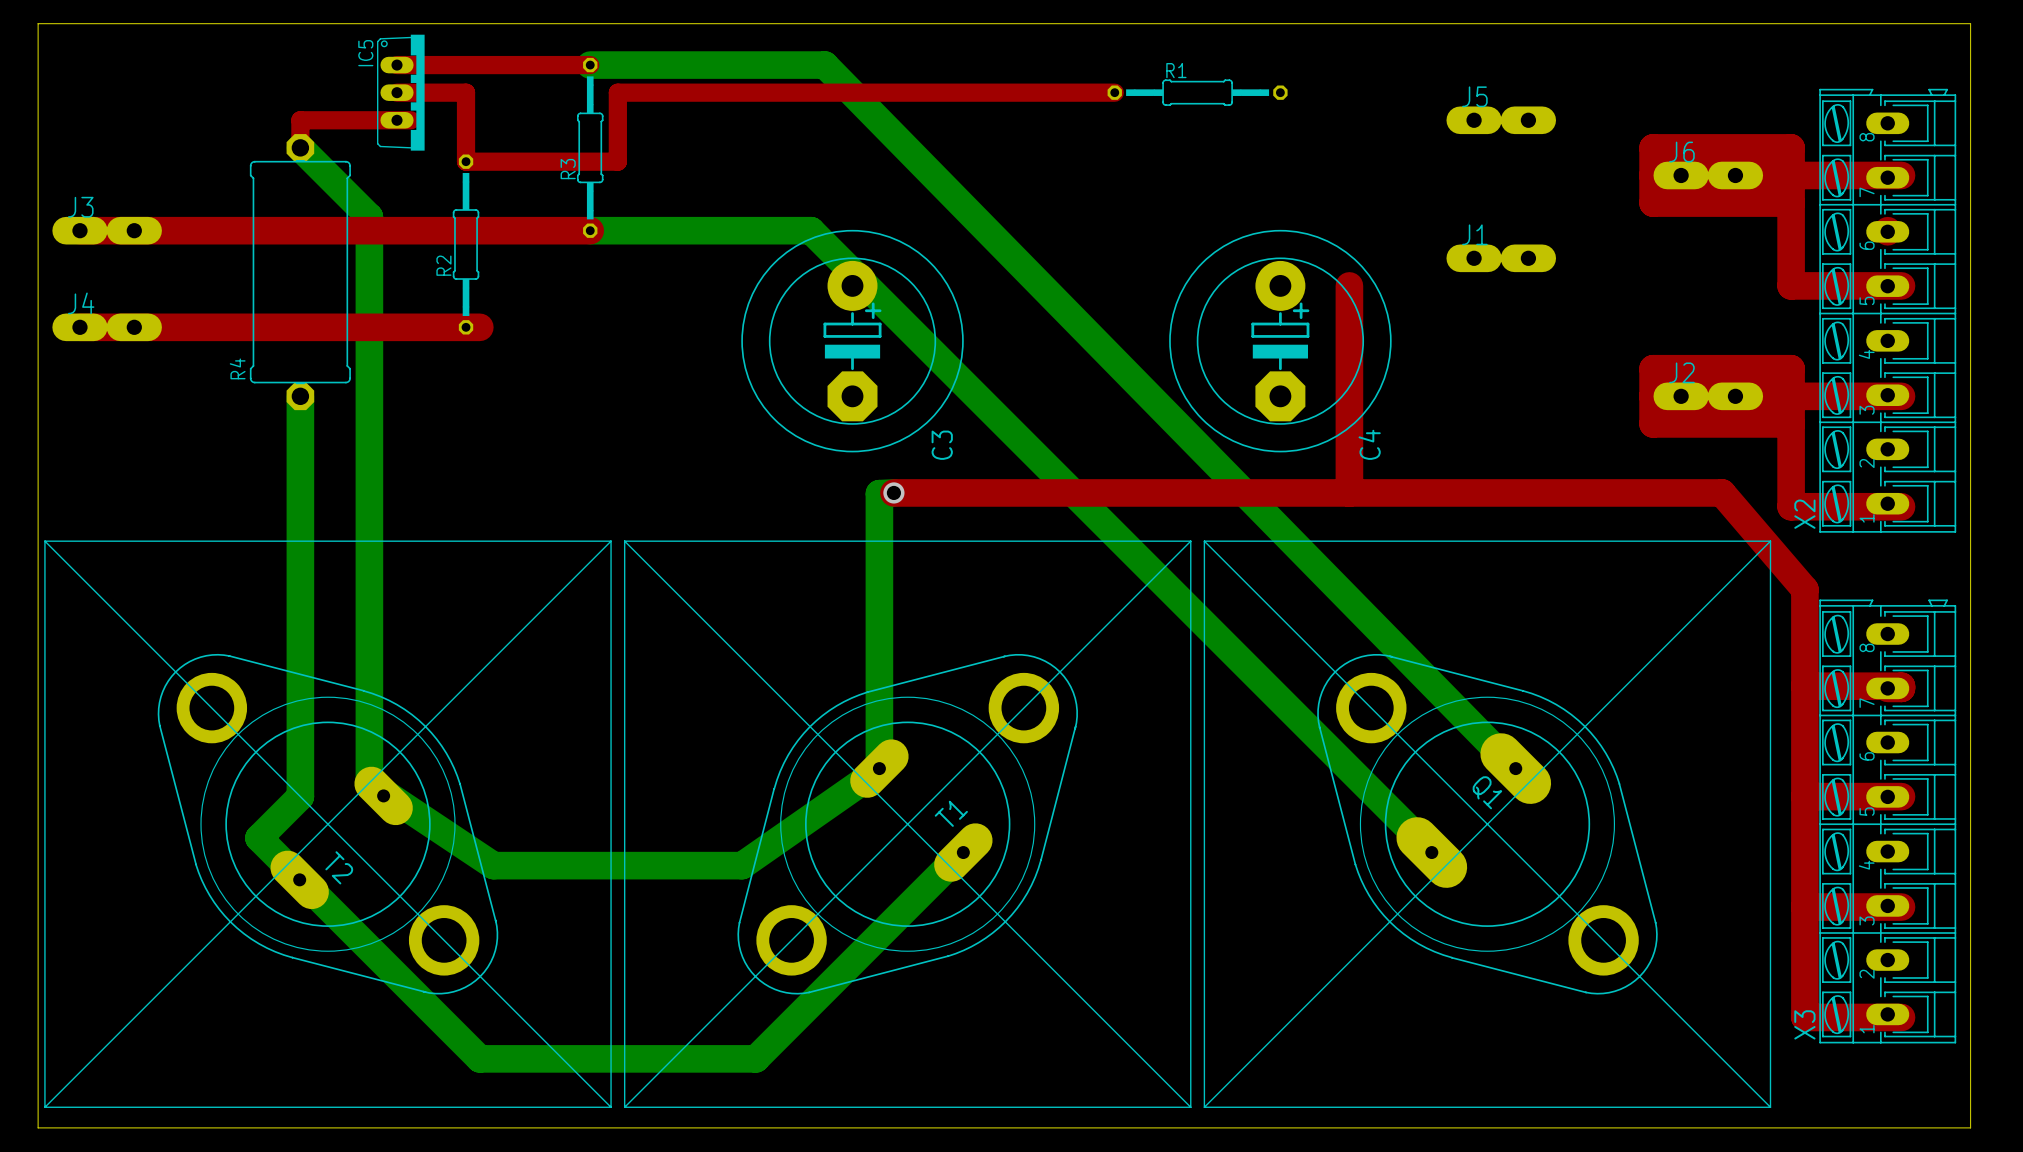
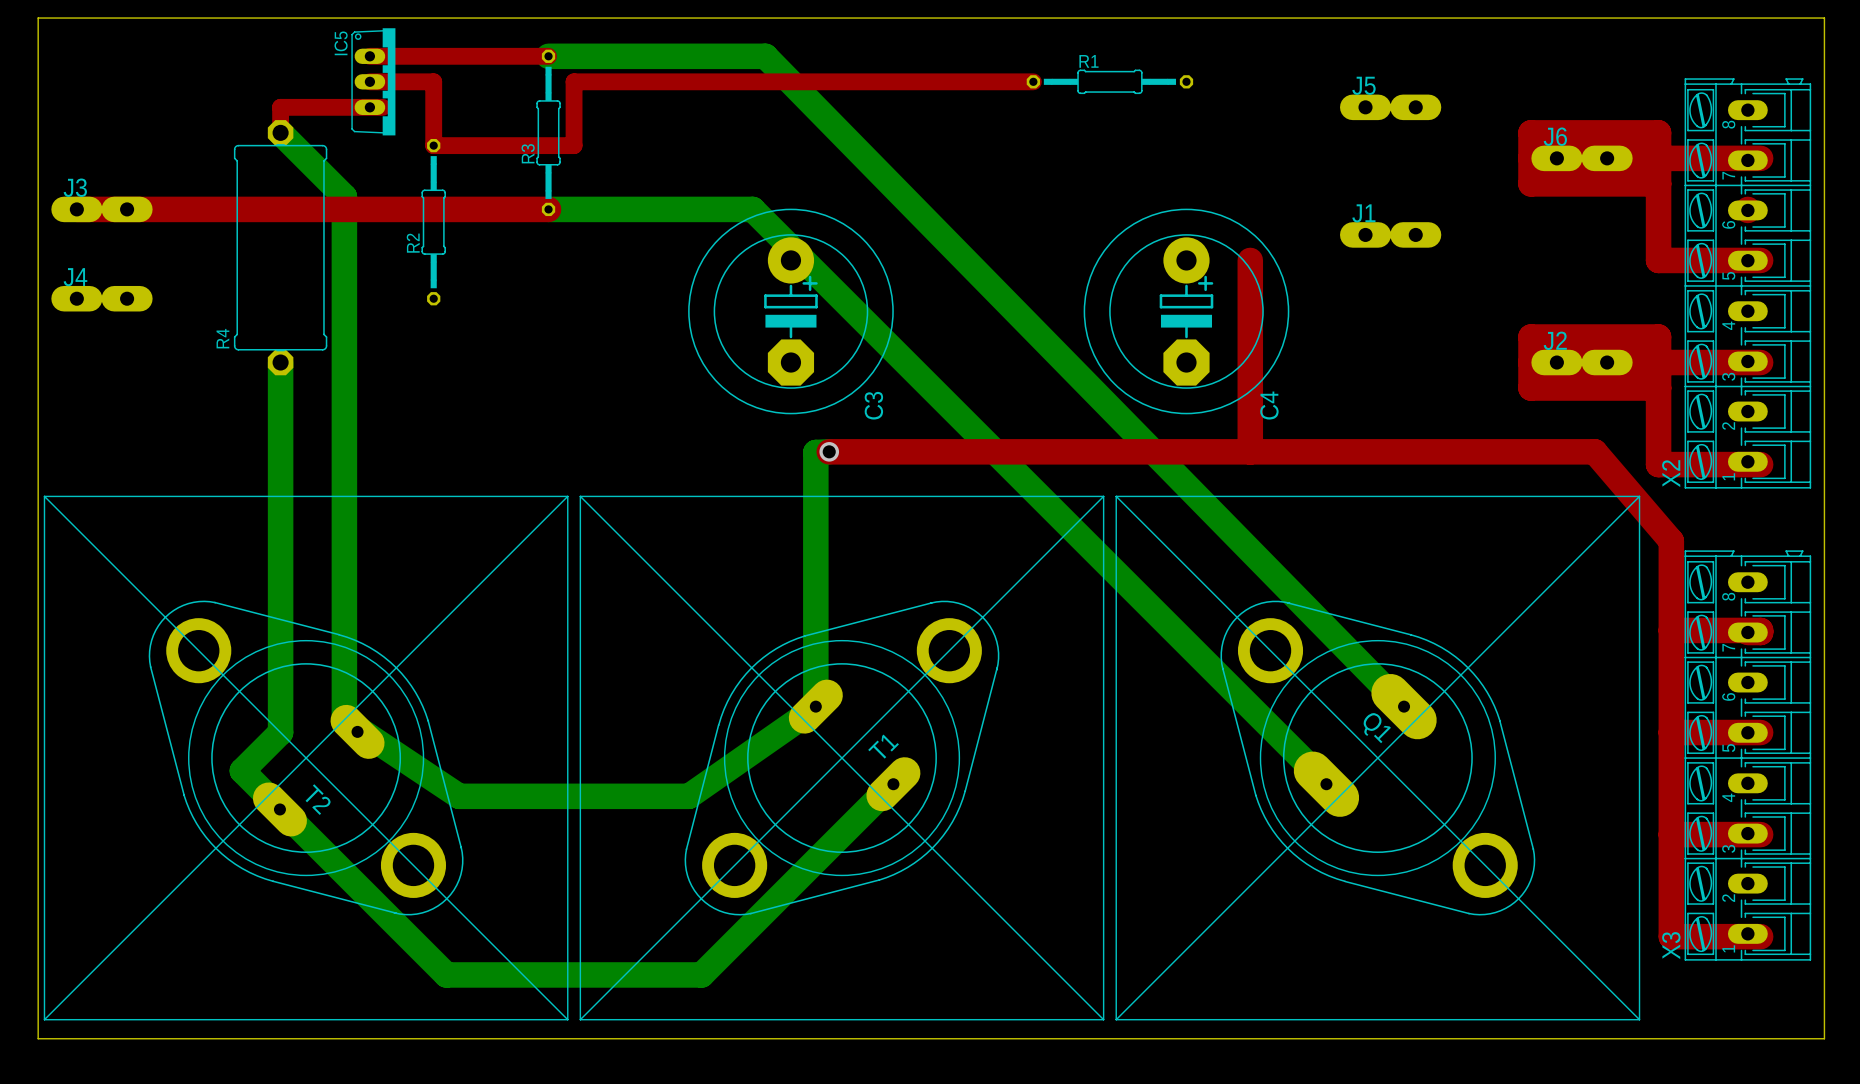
top track: (79, 327) (479, 327) -> none

